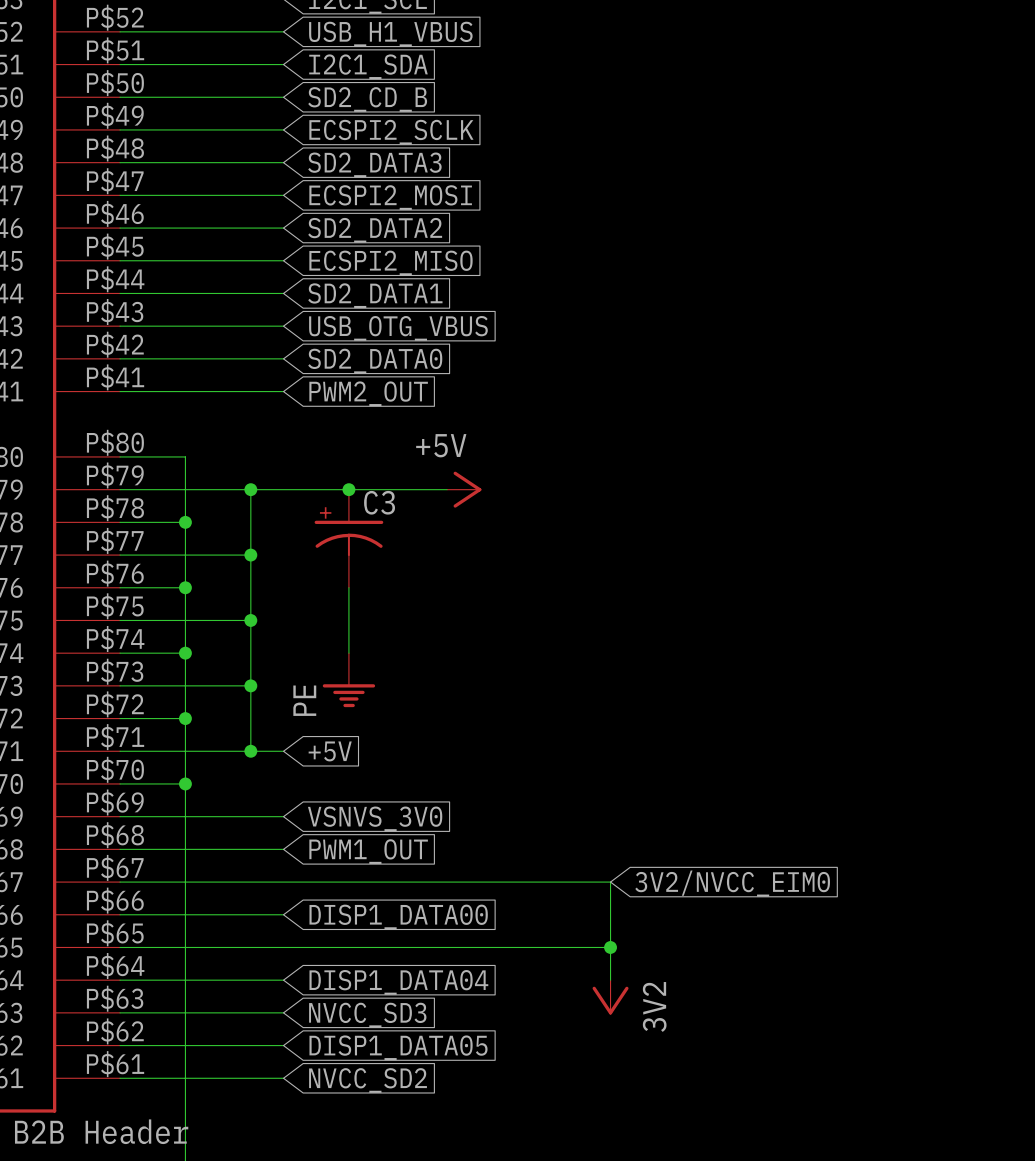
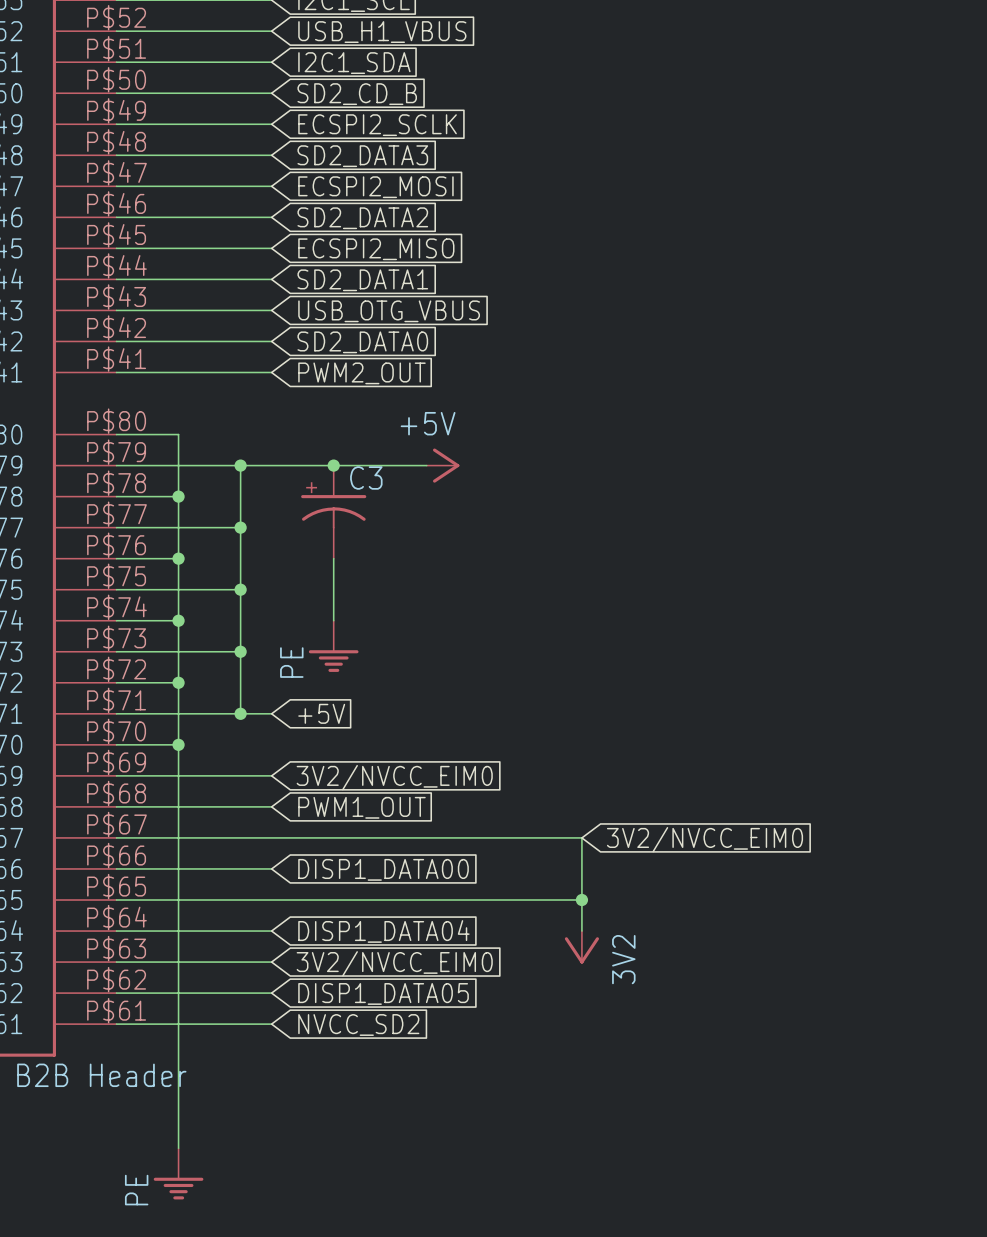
global label: VSNVS_3V0 (375, 818) -> 3V2/NVCC_EIM0 (394, 777)
global label: NVCC_SD3 (367, 1015) -> 3V2/NVCC_EIM0 (394, 963)

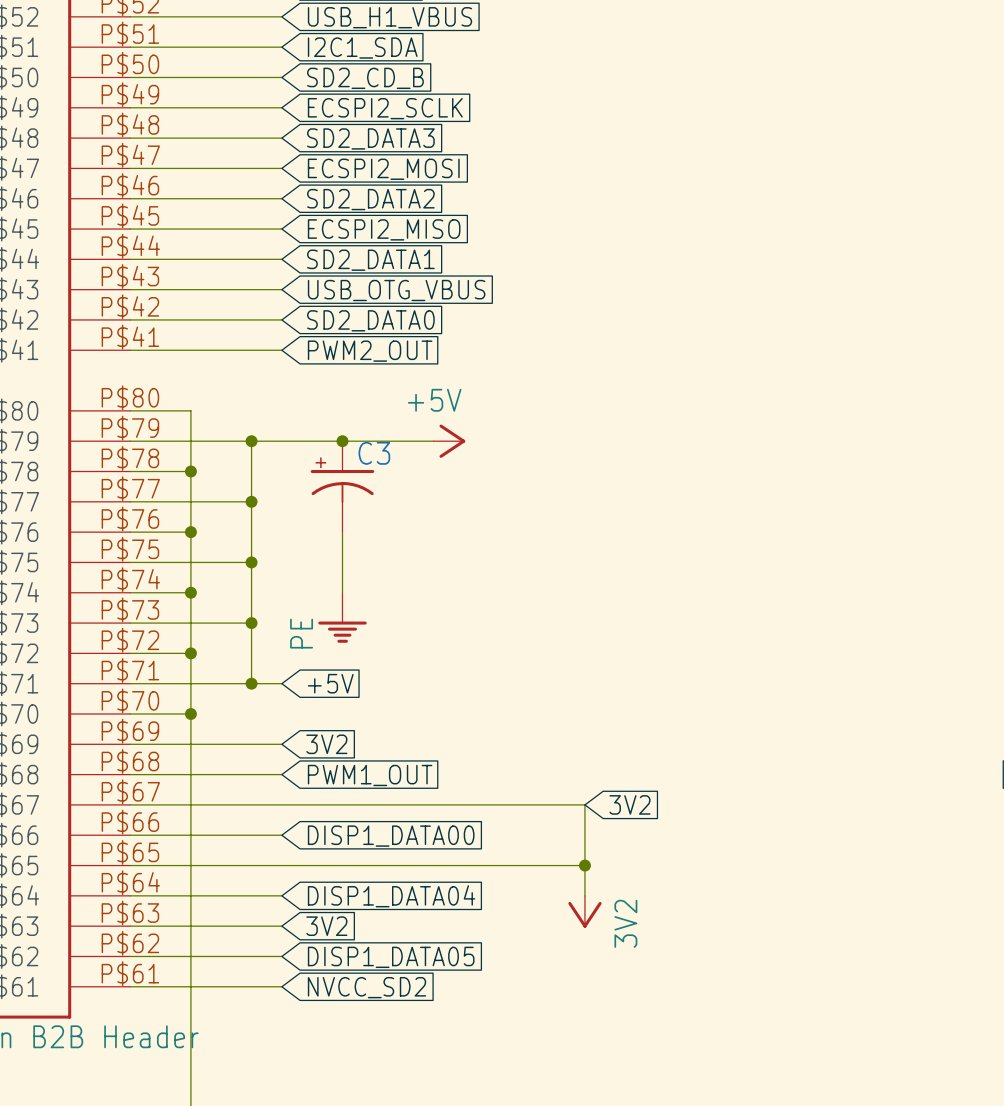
global label: 3V2/NVCC_EIM0 (394, 777) -> 3V2 (326, 744)
global label: 3V2/NVCC_EIM0 (704, 839) -> 3V2 (629, 804)
global label: 3V2/NVCC_EIM0 (394, 963) -> 3V2 (326, 926)

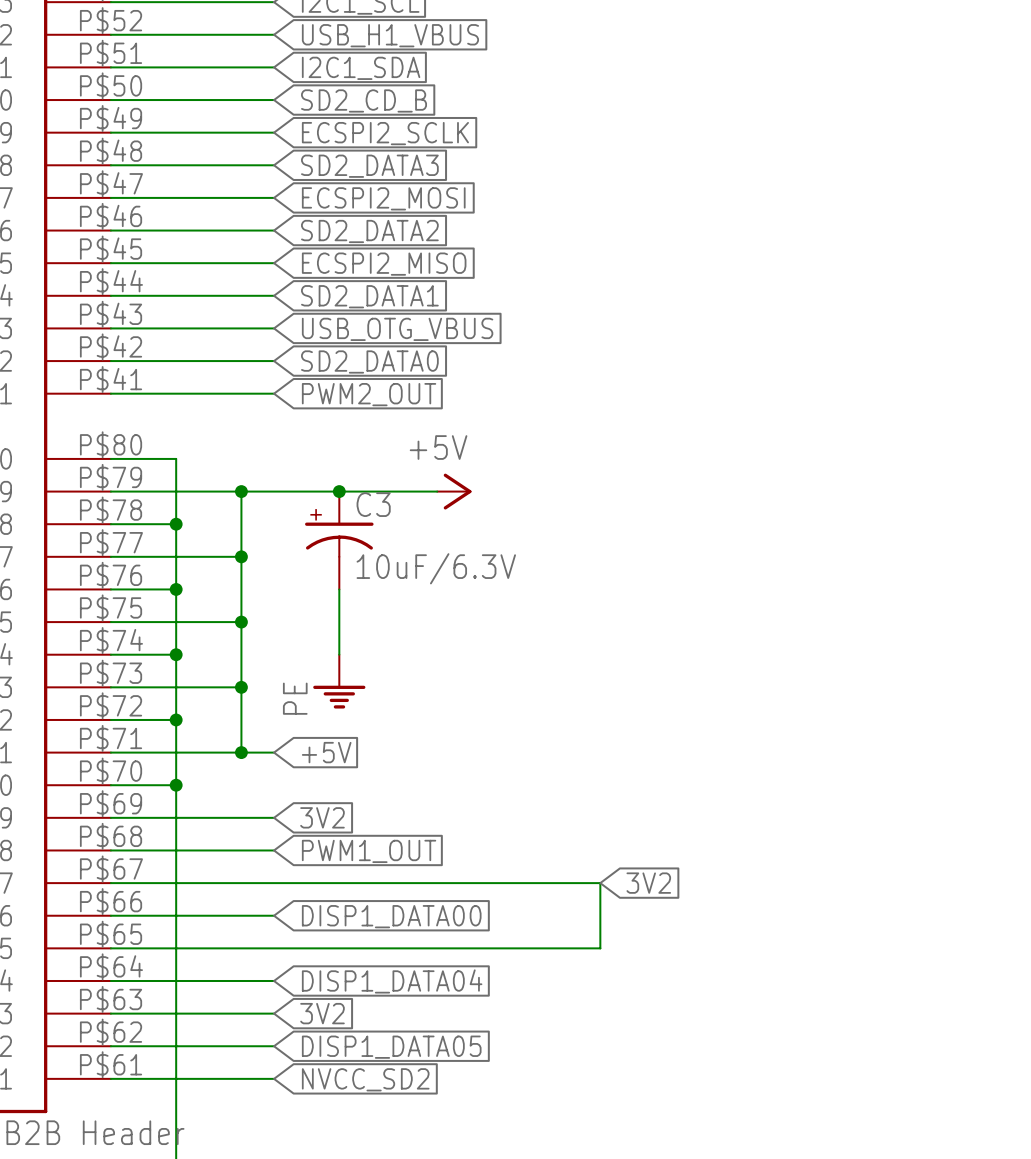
C3 value: none -> 10uF/6.3V (436, 568)
wire: (584, 865) (584, 895) -> none
junction: (584, 865) -> none
power symbol: 3V2 (584, 911) -> none

